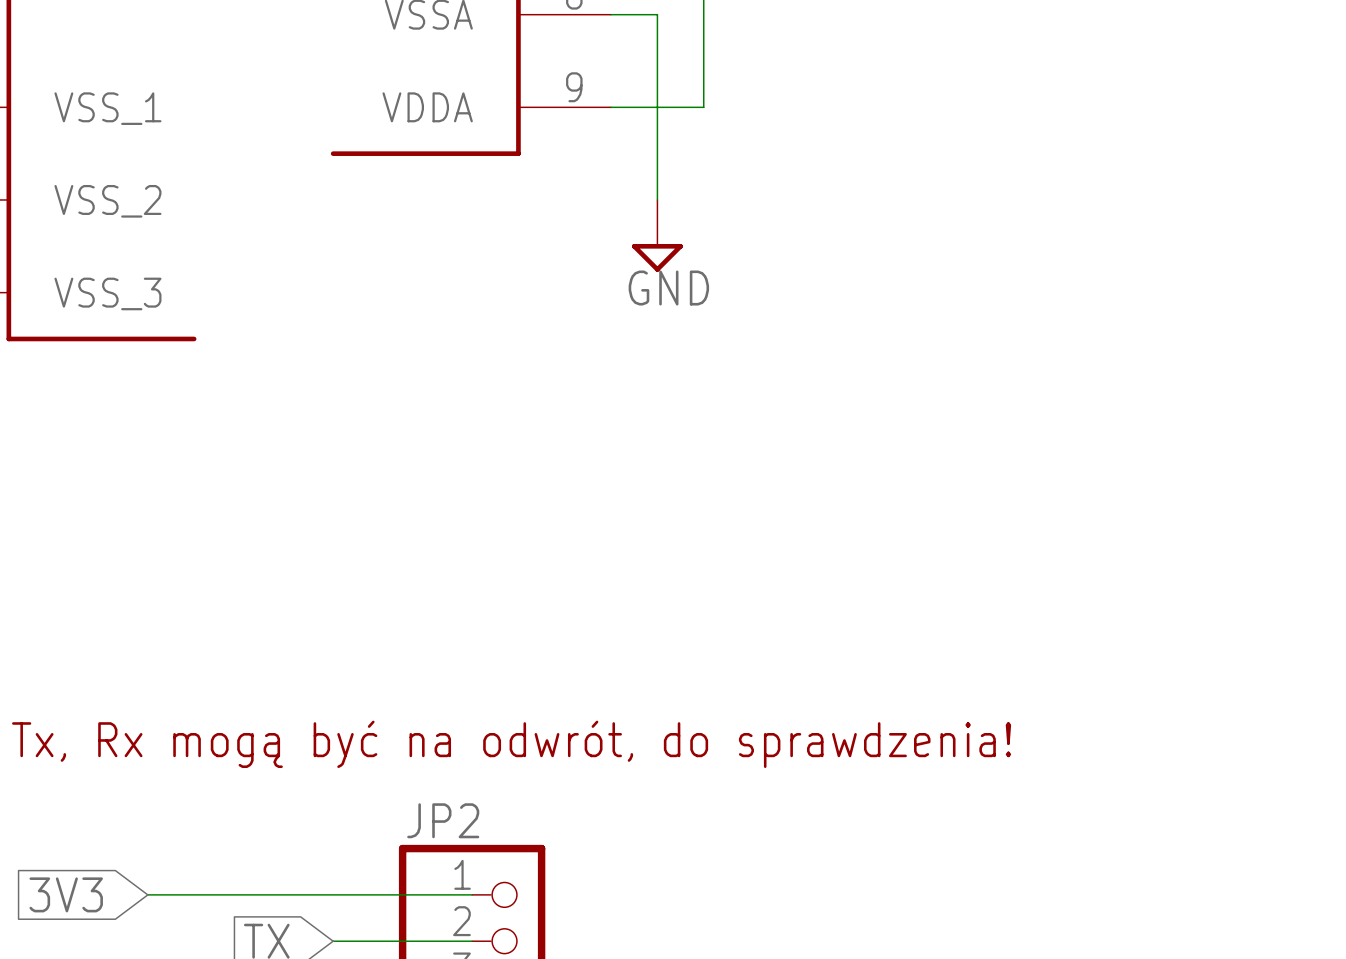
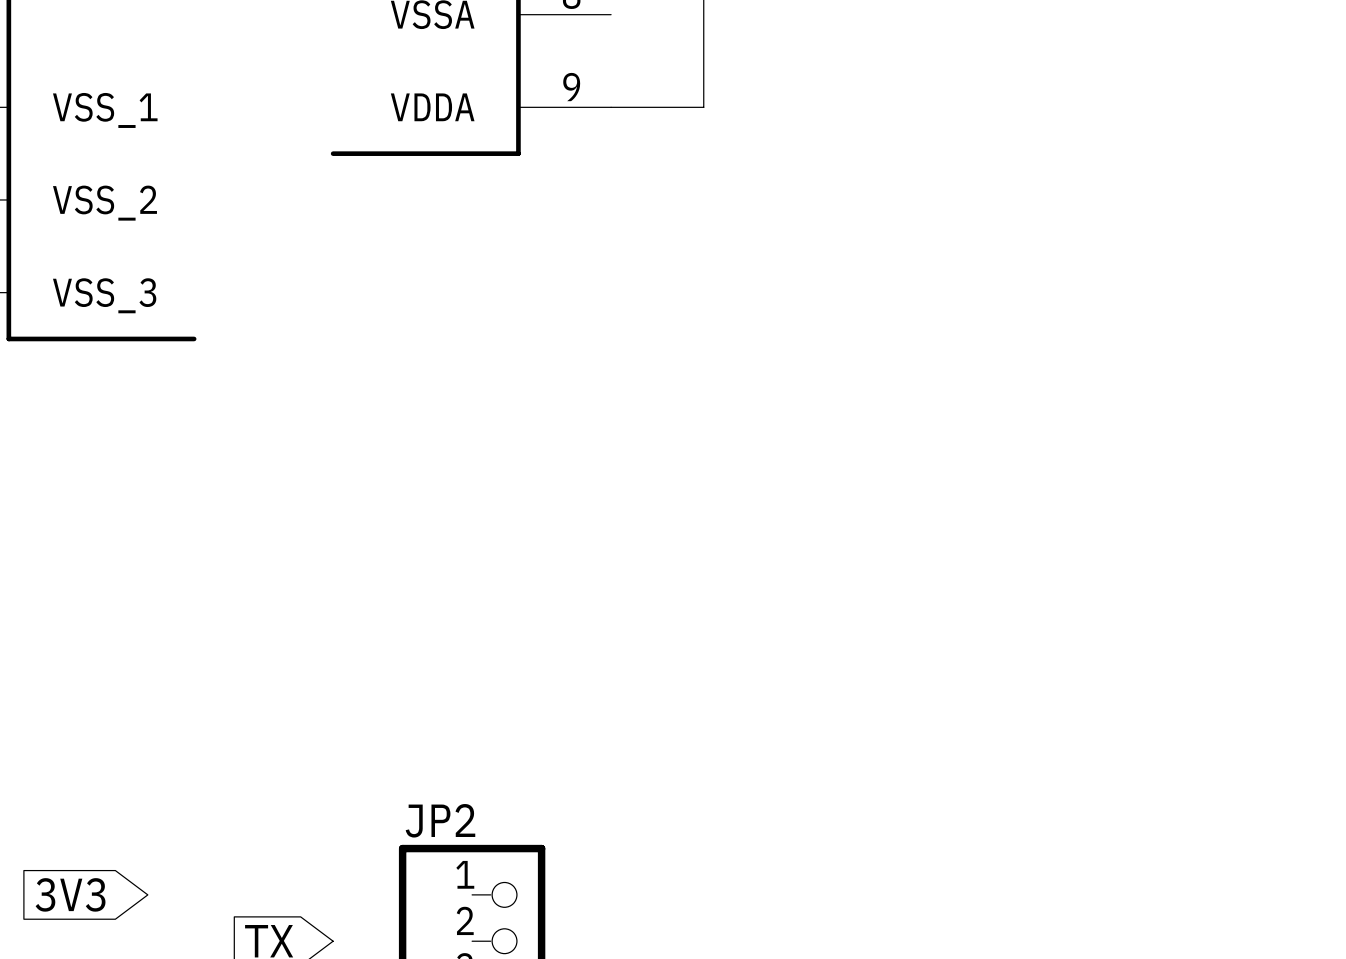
wire: (611, 14) (657, 14) (657, 199) -> none
power symbol: GND (657, 235) -> none
text: Tx, Rx mogą być na odwrót, do sprawdzenia! (511, 744) -> none
wire: (147, 894) (472, 894) -> none
wire: (333, 941) (472, 941) -> none

